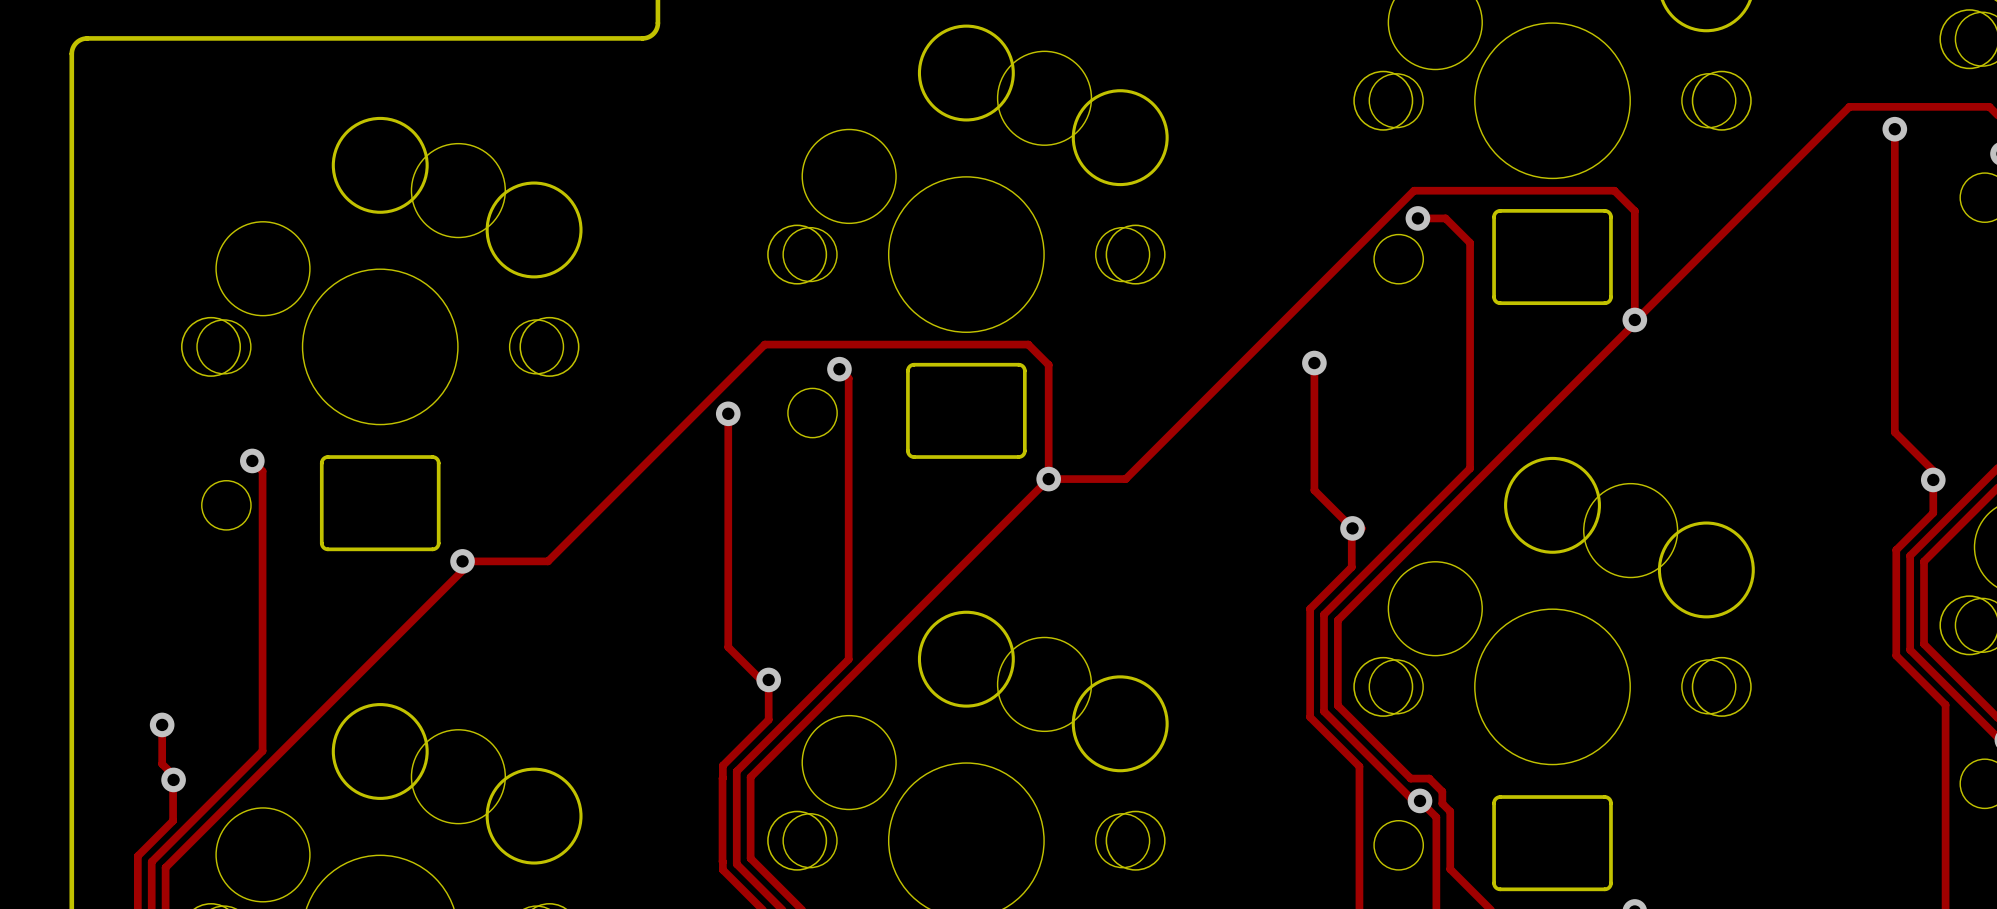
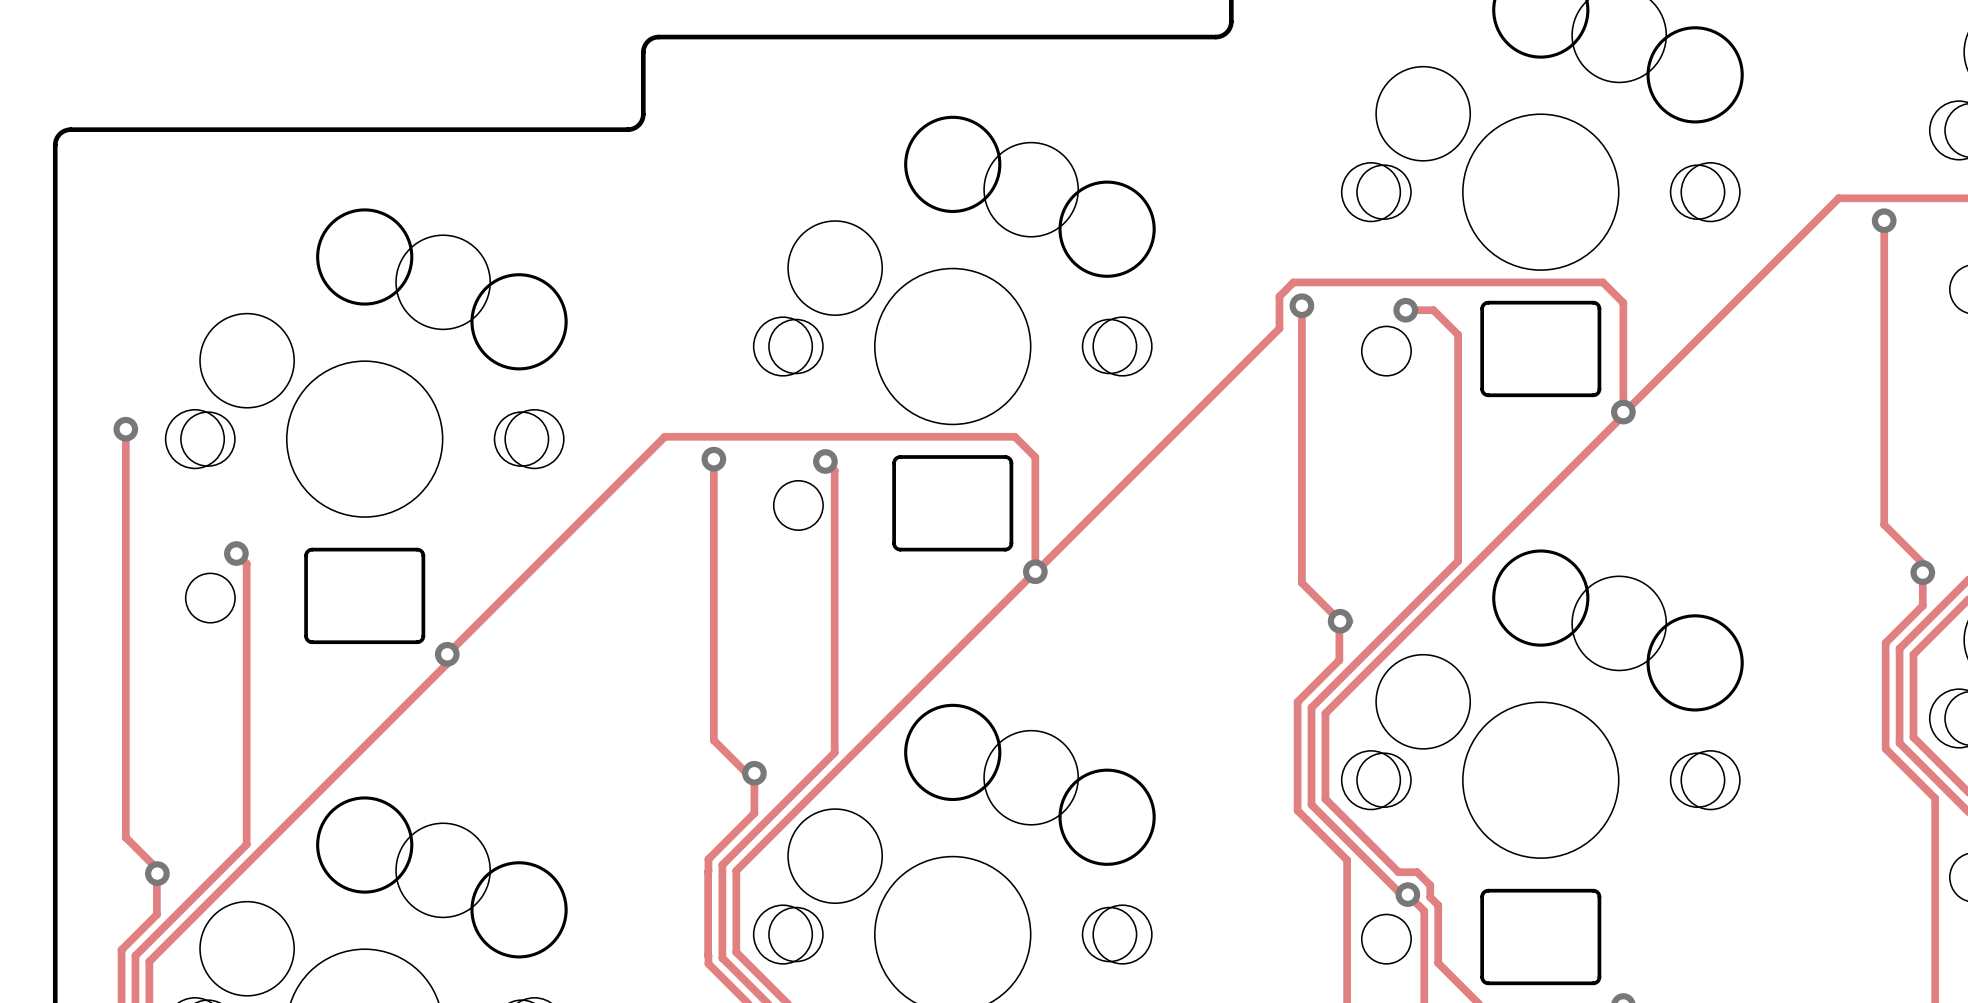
track: (1414, 190) (1125, 479) (1049, 479) -> (1401, 282) (1293, 282) (1279, 296) (1279, 328) (1036, 571)
track: none -> (1301, 305) (1301, 455)
via: none -> (125, 429)
track: (764, 344) (548, 561) (462, 561) -> (750, 436) (664, 436) (447, 654)
via position: (1314, 363) -> (1301, 305)
track: none -> (713, 459) (713, 506)
via position: (728, 413) -> (713, 459)
track: (162, 724) (162, 764) -> (125, 429) (125, 837) (145, 857)
via: (162, 724) -> none

